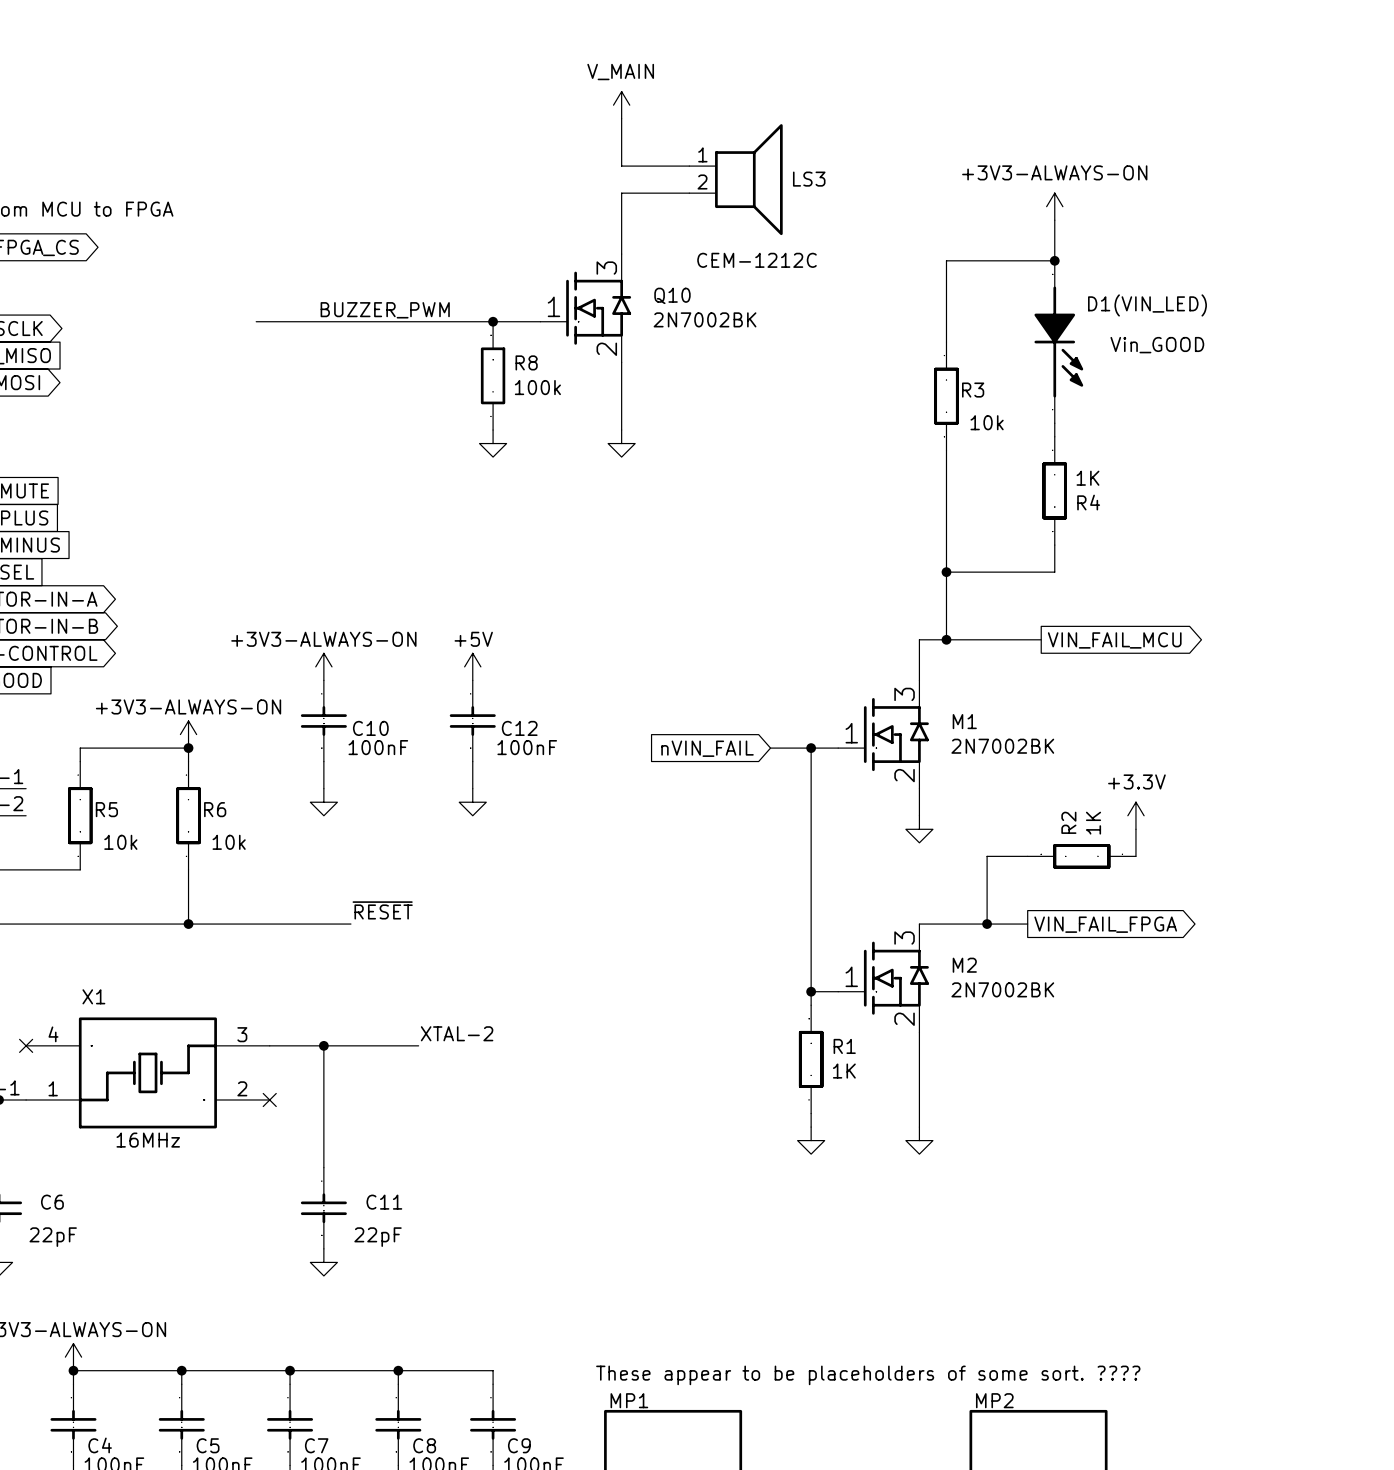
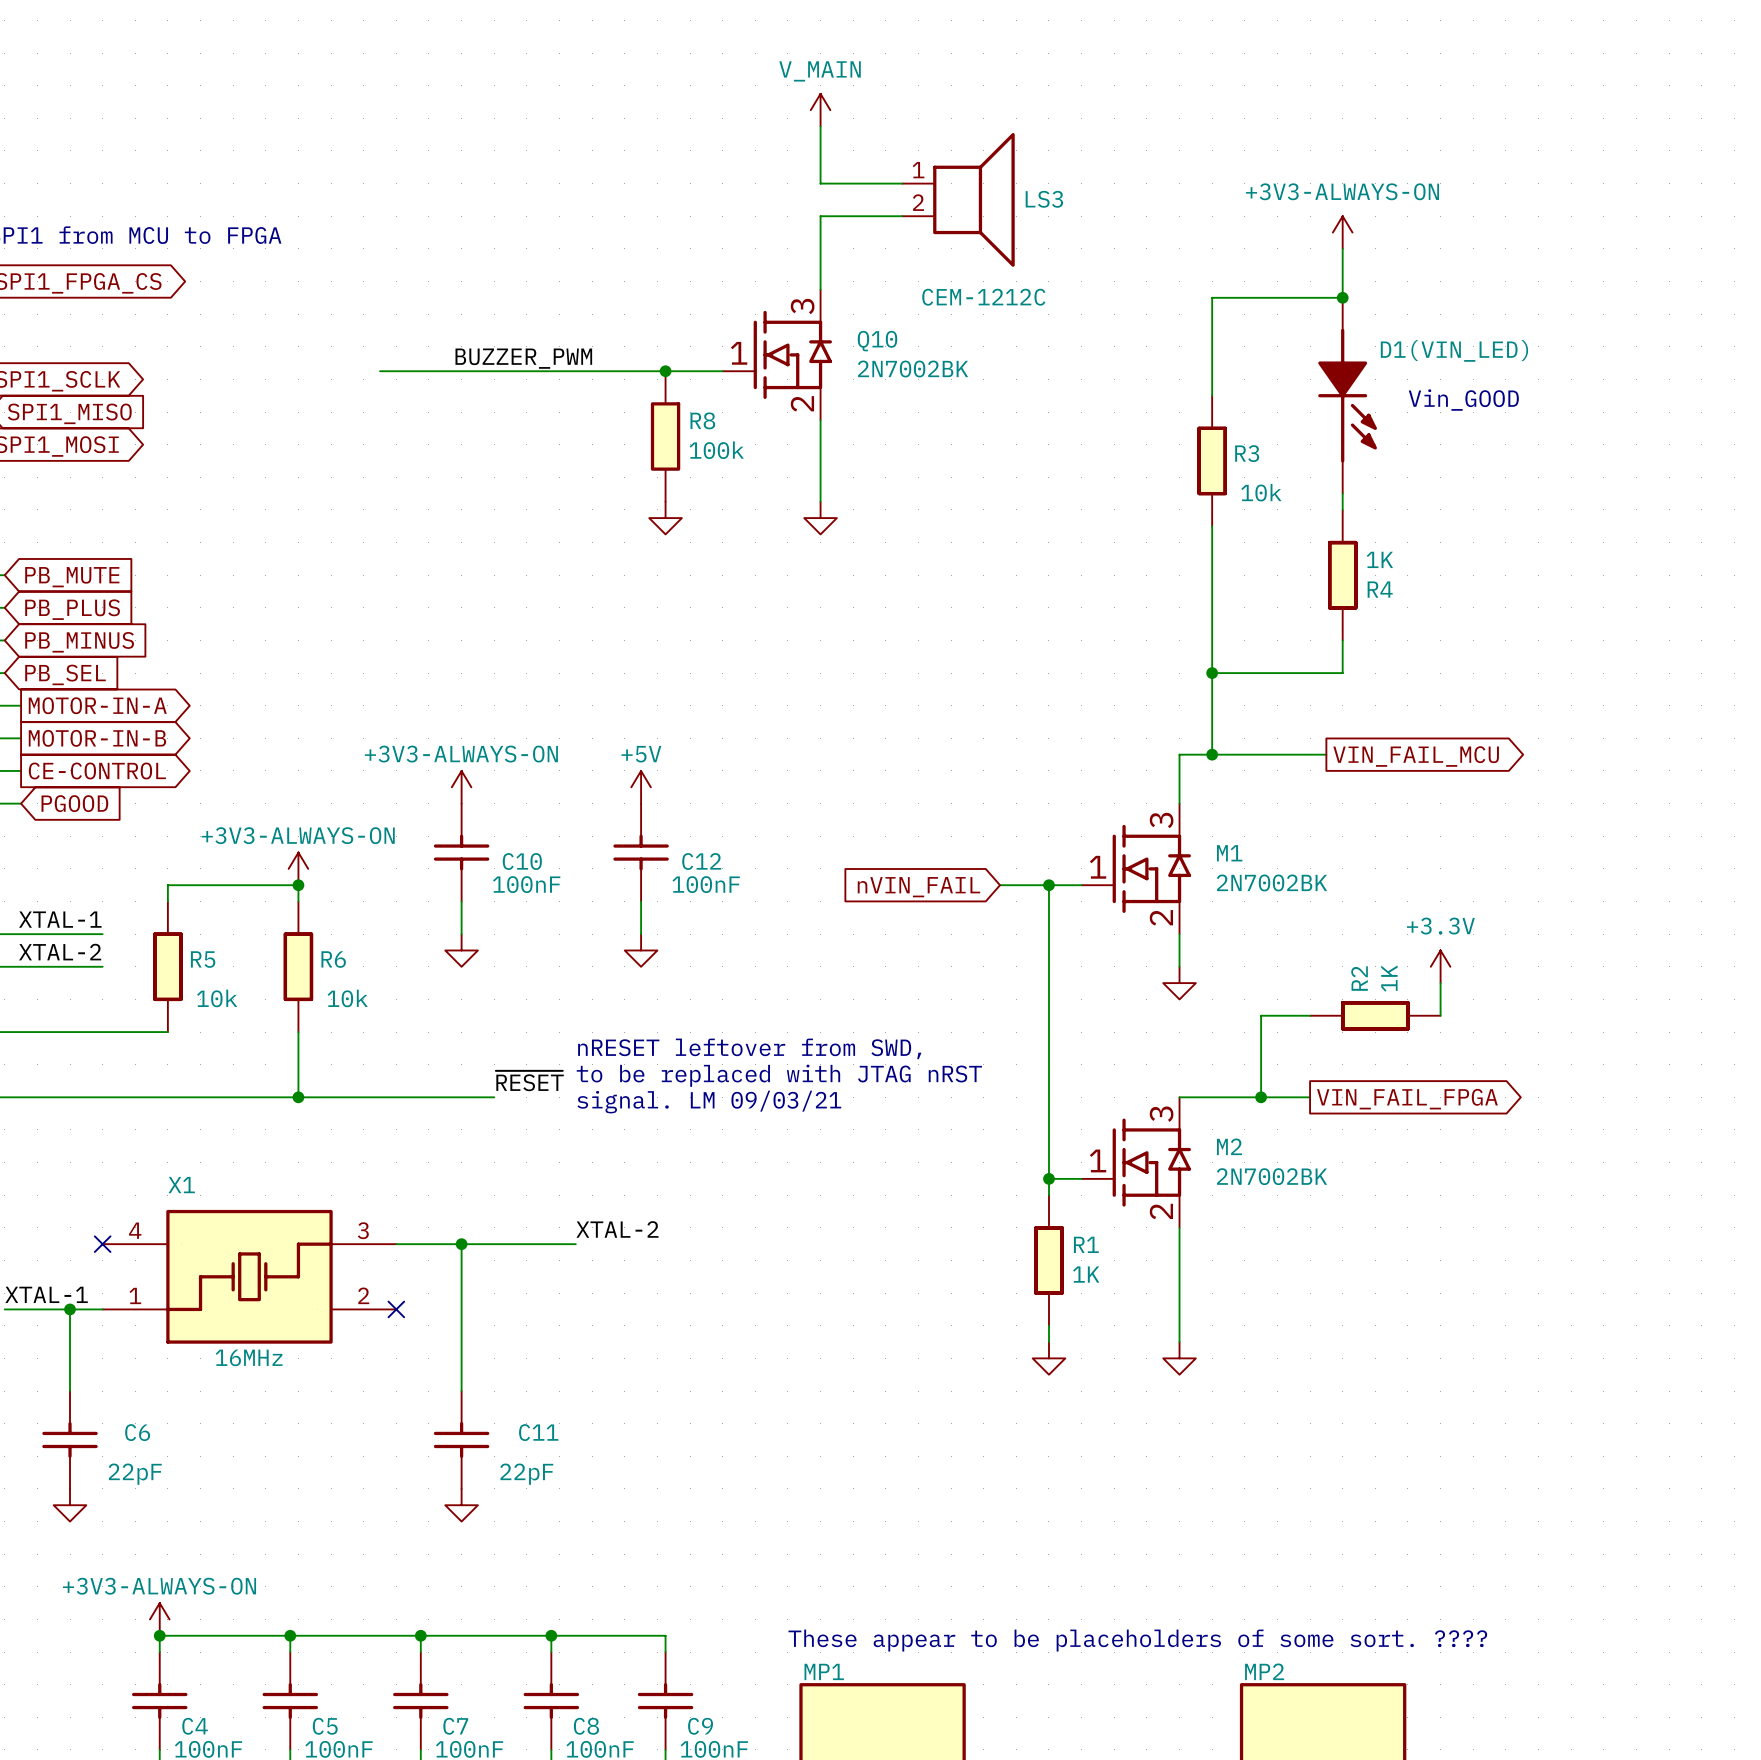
text: none -> nRESET leftover from SWD, (749, 1048)
text: none -> to be replaced with JTAG nRST (779, 1075)
text: none -> signal. LM 09/03/21 (709, 1102)

